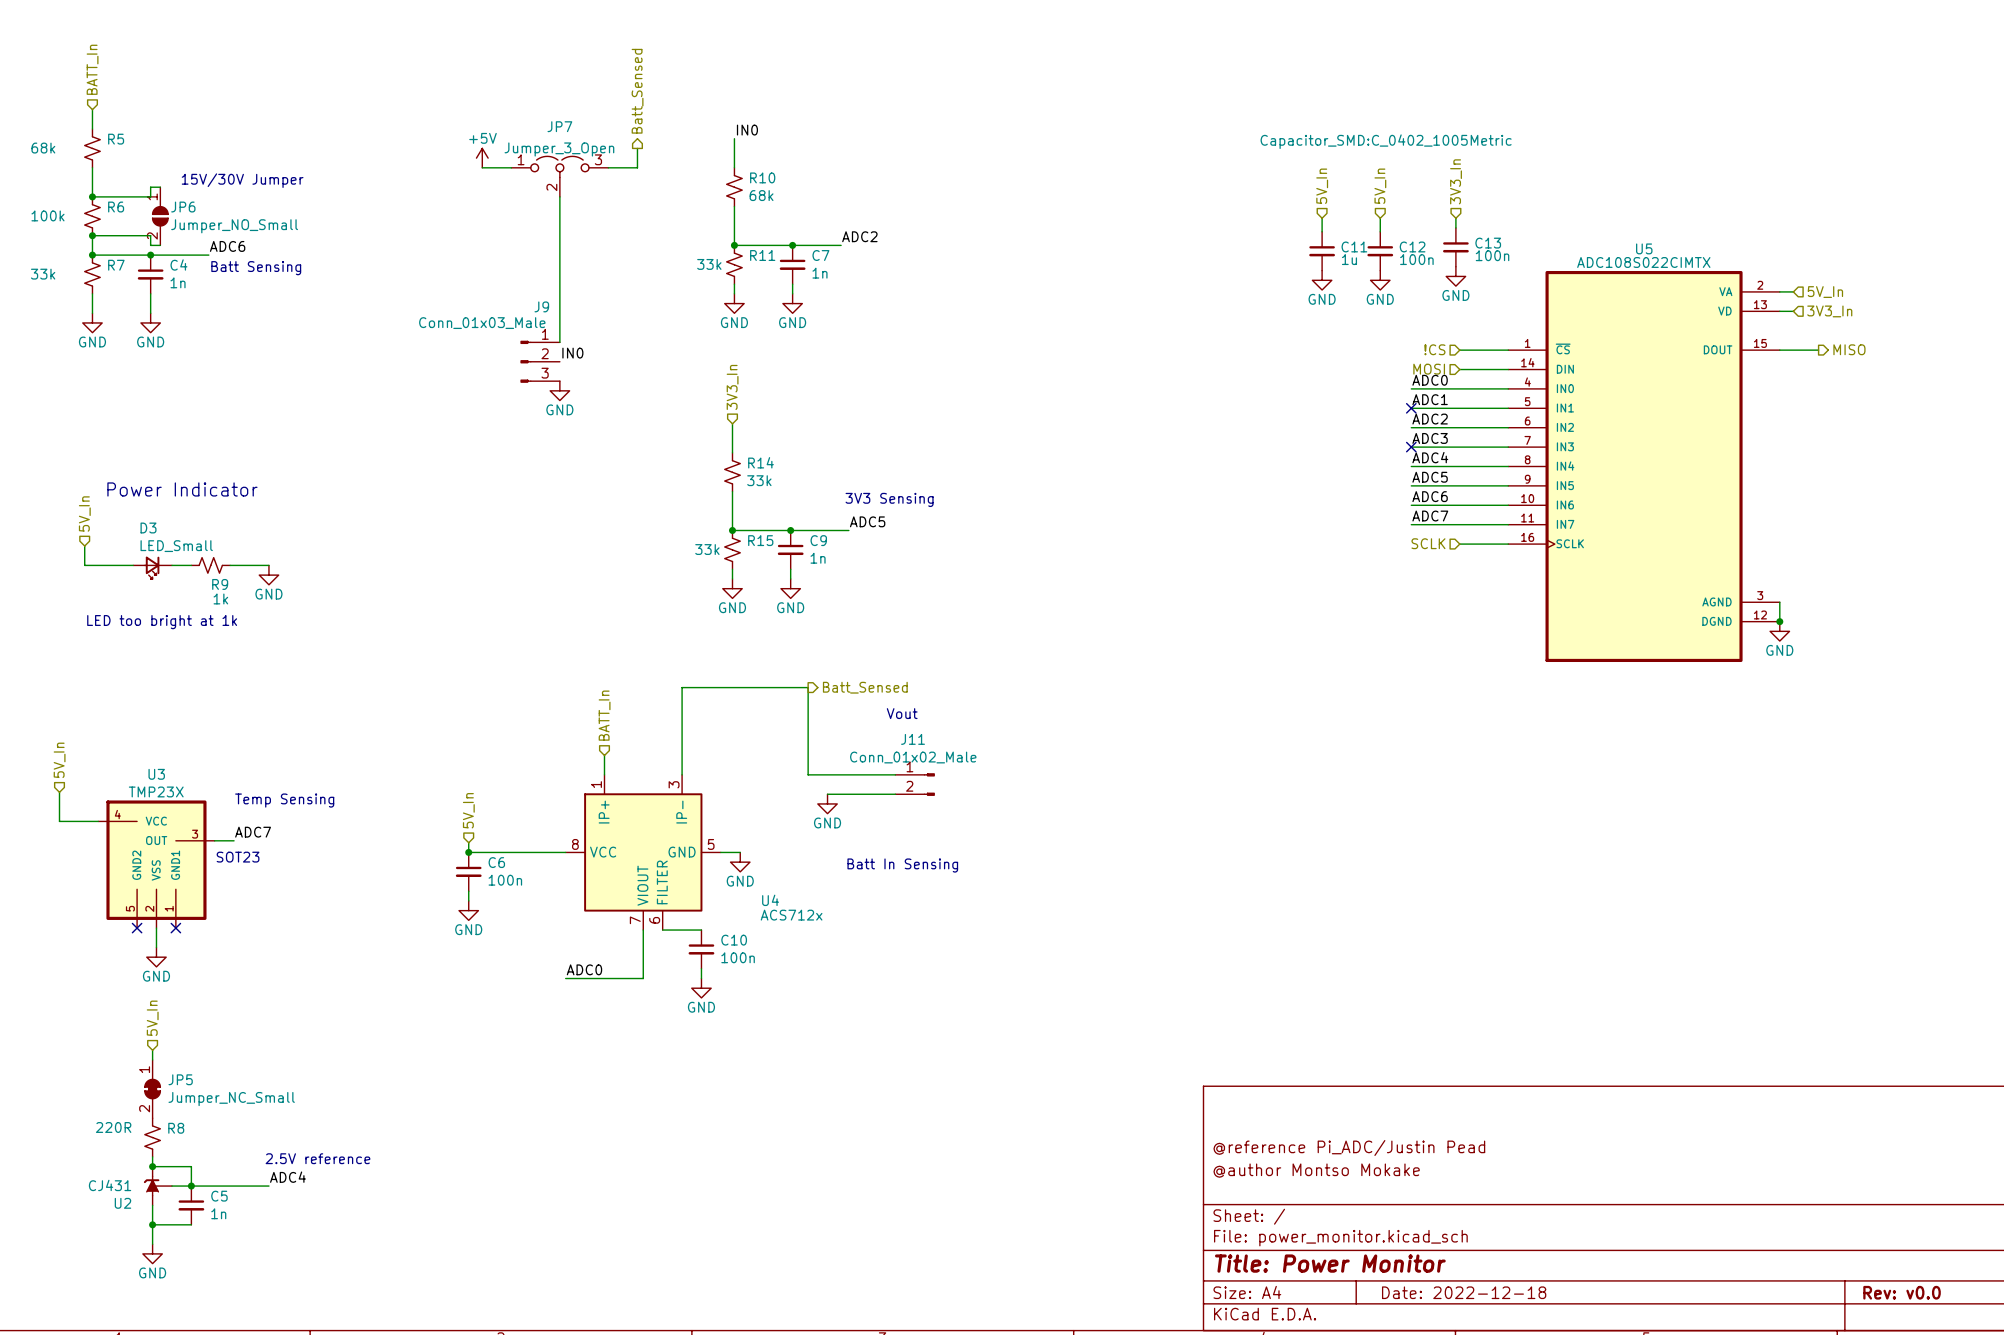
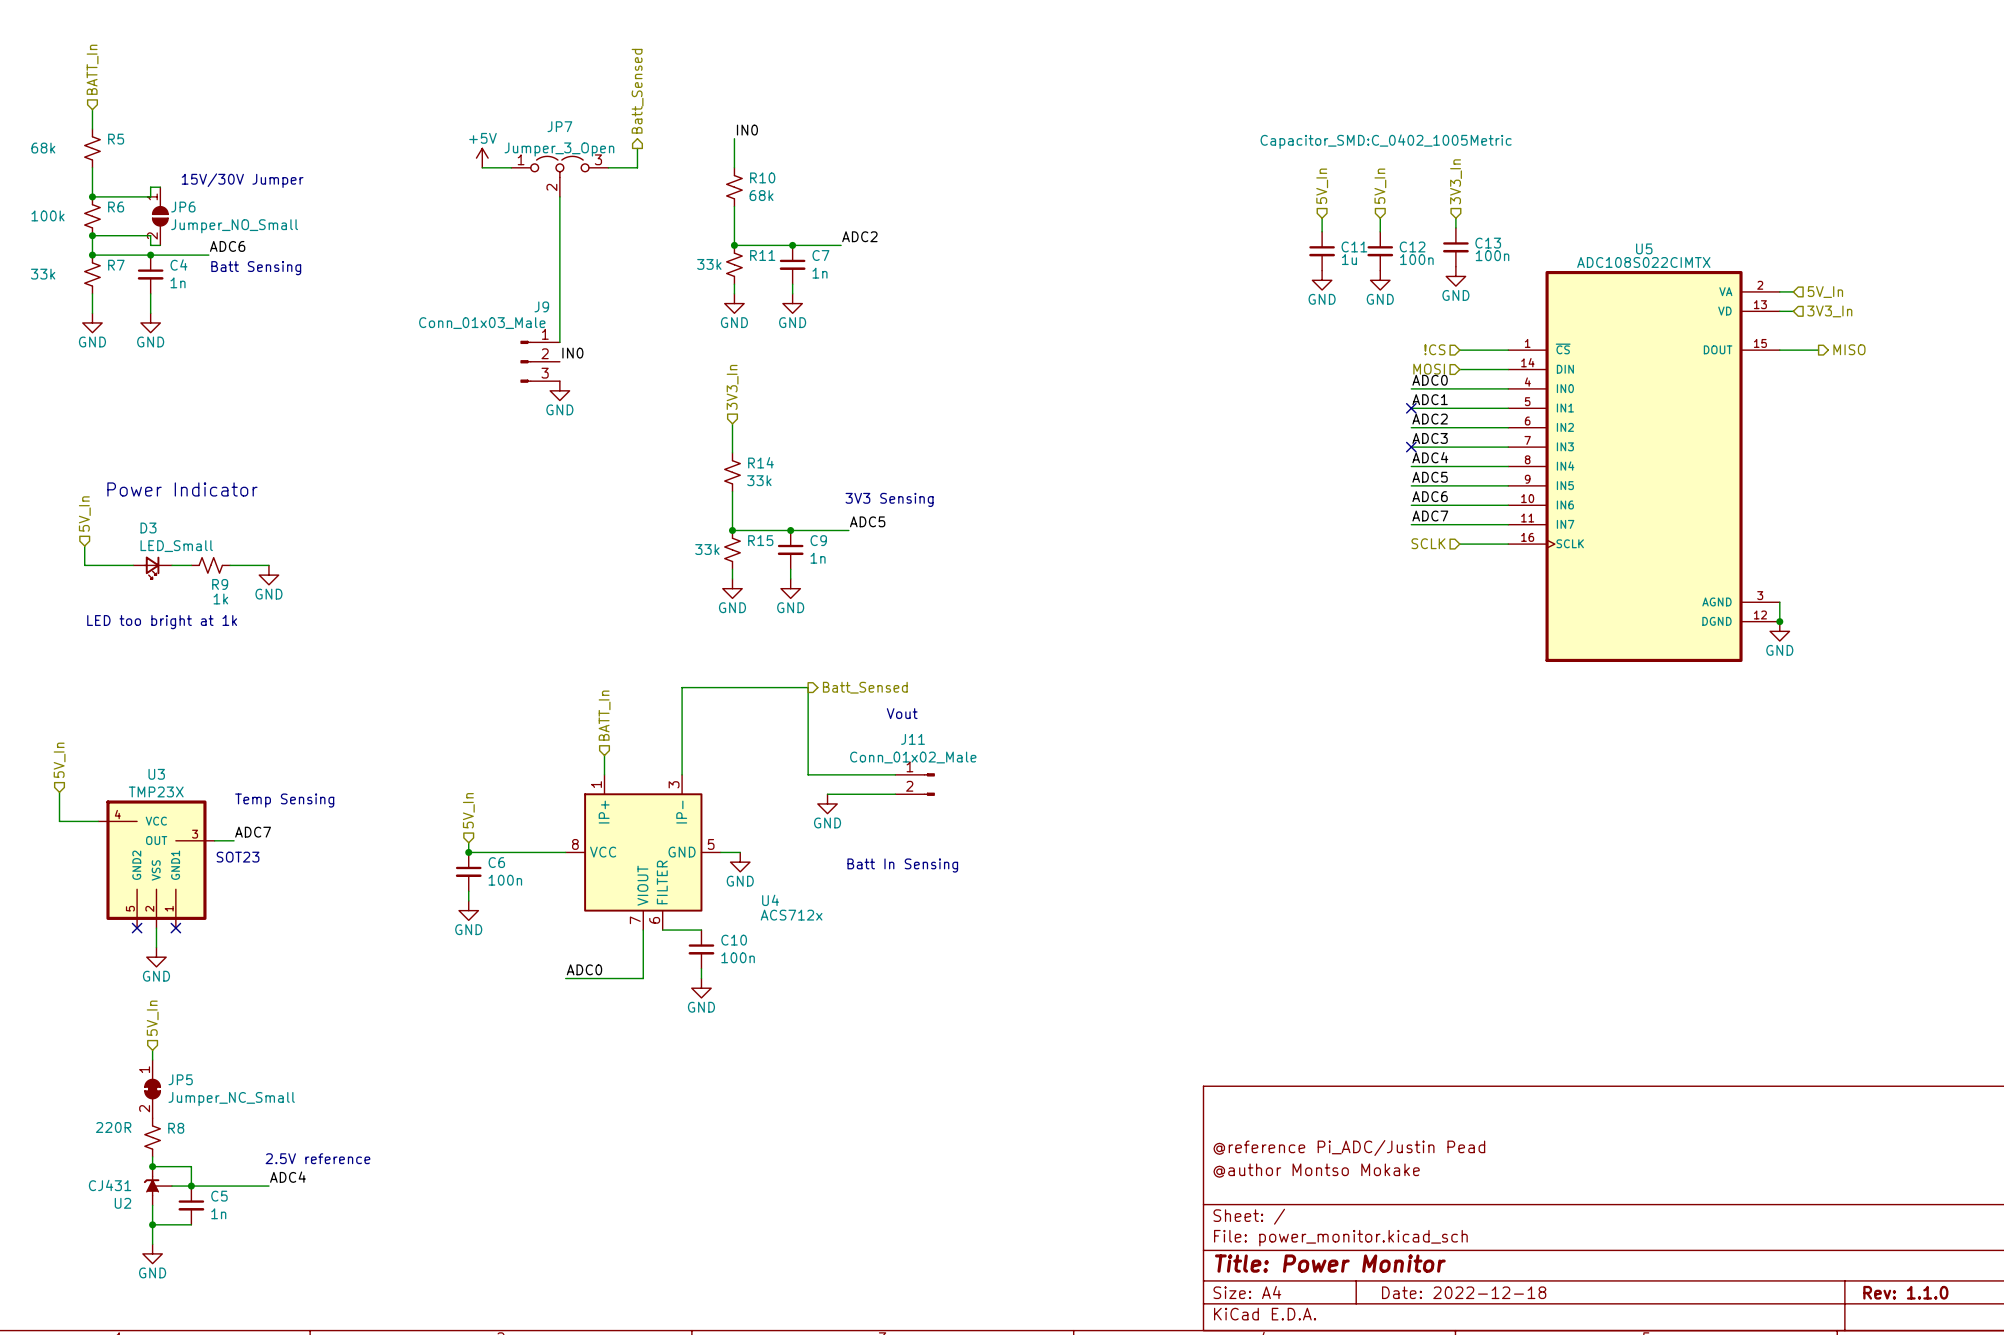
title block: Rev: v0.0 (1902, 1292) -> Rev: 1.1.0 (1905, 1292)

